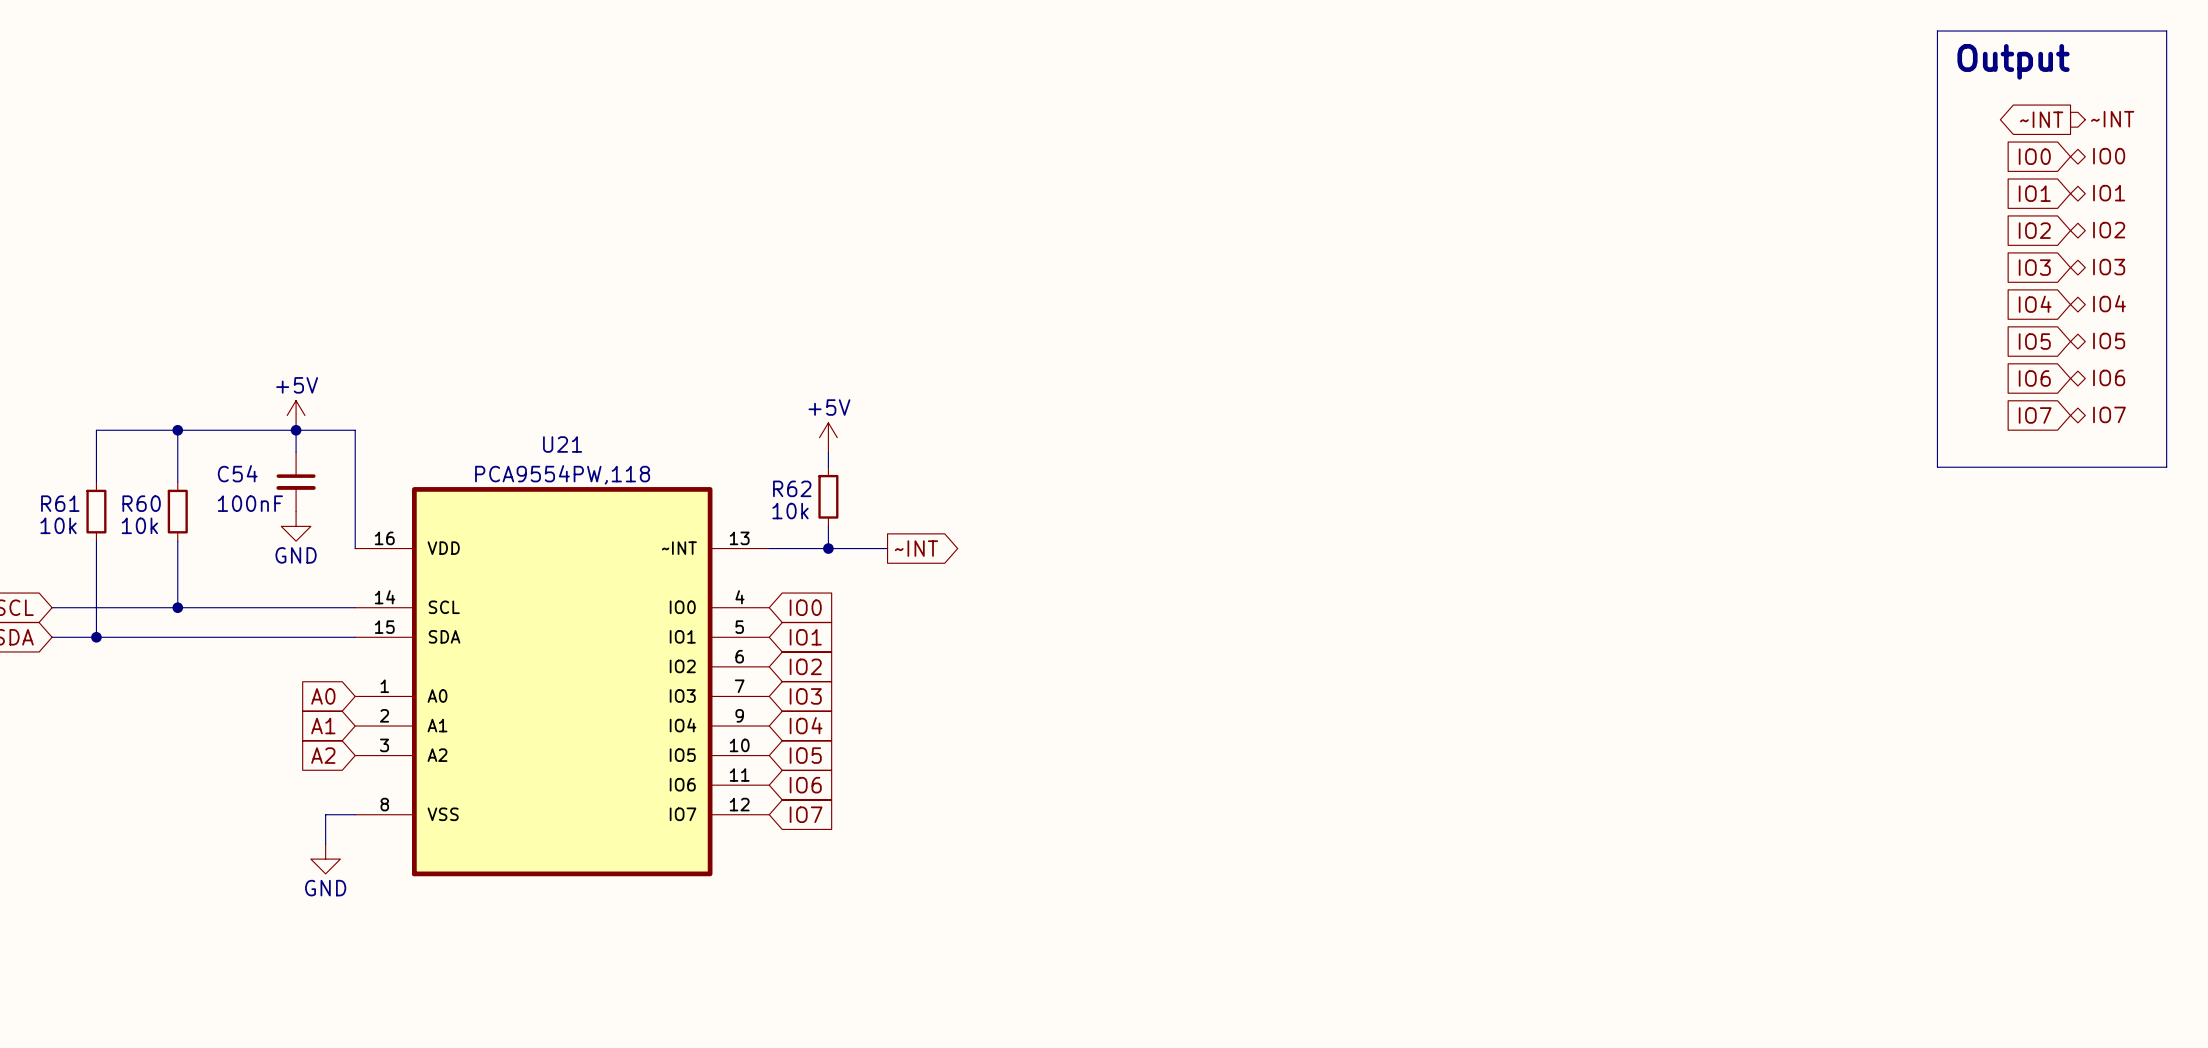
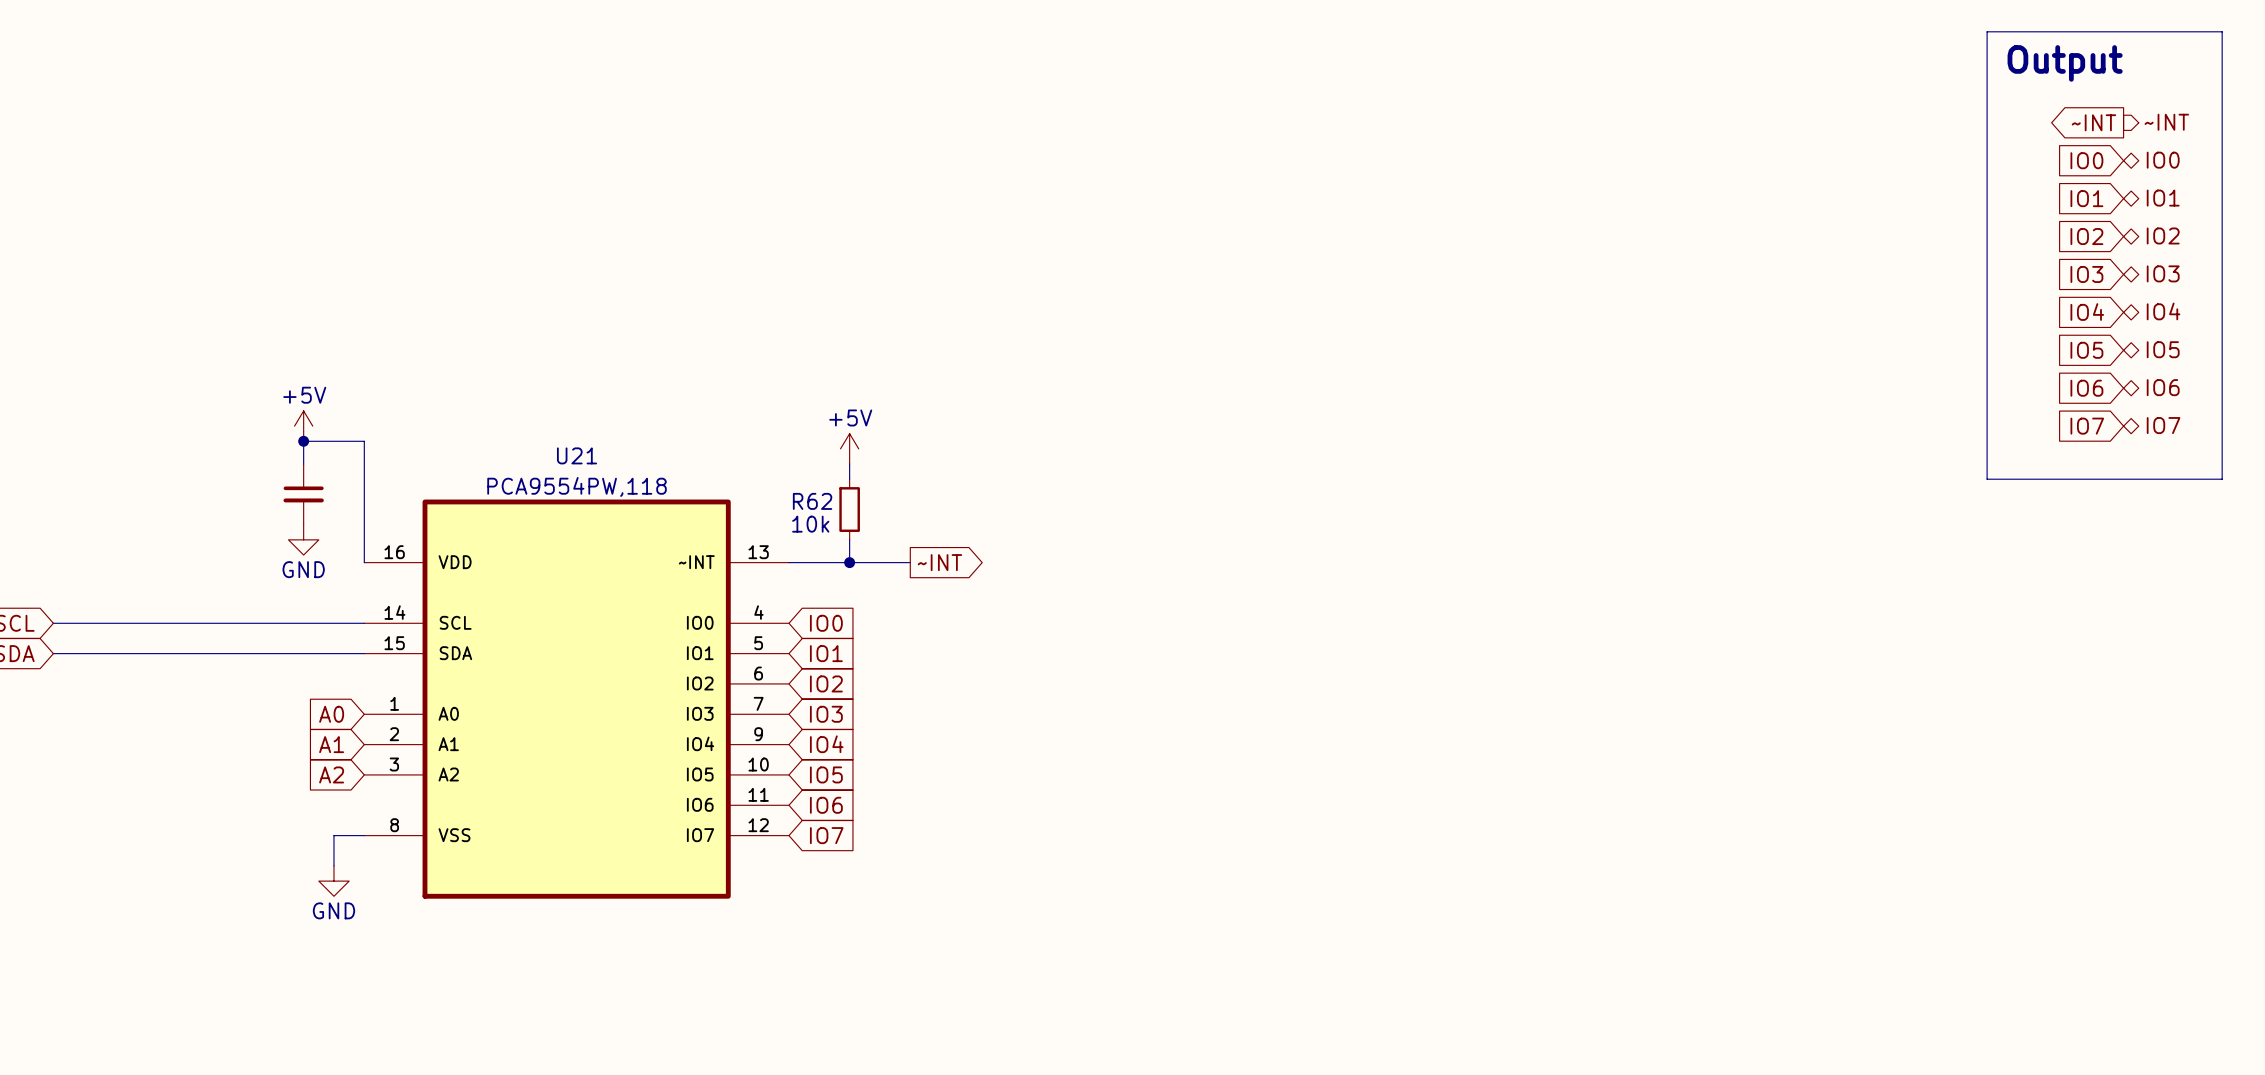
wire: (177, 430) (177, 482) -> none
junction: (177, 430) -> none
wire: (296, 430) (96, 430) (96, 482) -> none
C54 name: C54 (237, 473) -> none
C54 value: 100nF (250, 503) -> none
R61: 10k (96, 511) -> none
R60: 10k (177, 511) -> none
wire: (96, 541) (96, 637) -> none
wire: (177, 541) (177, 607) -> none
junction: (177, 607) -> none
junction: (96, 637) -> none

